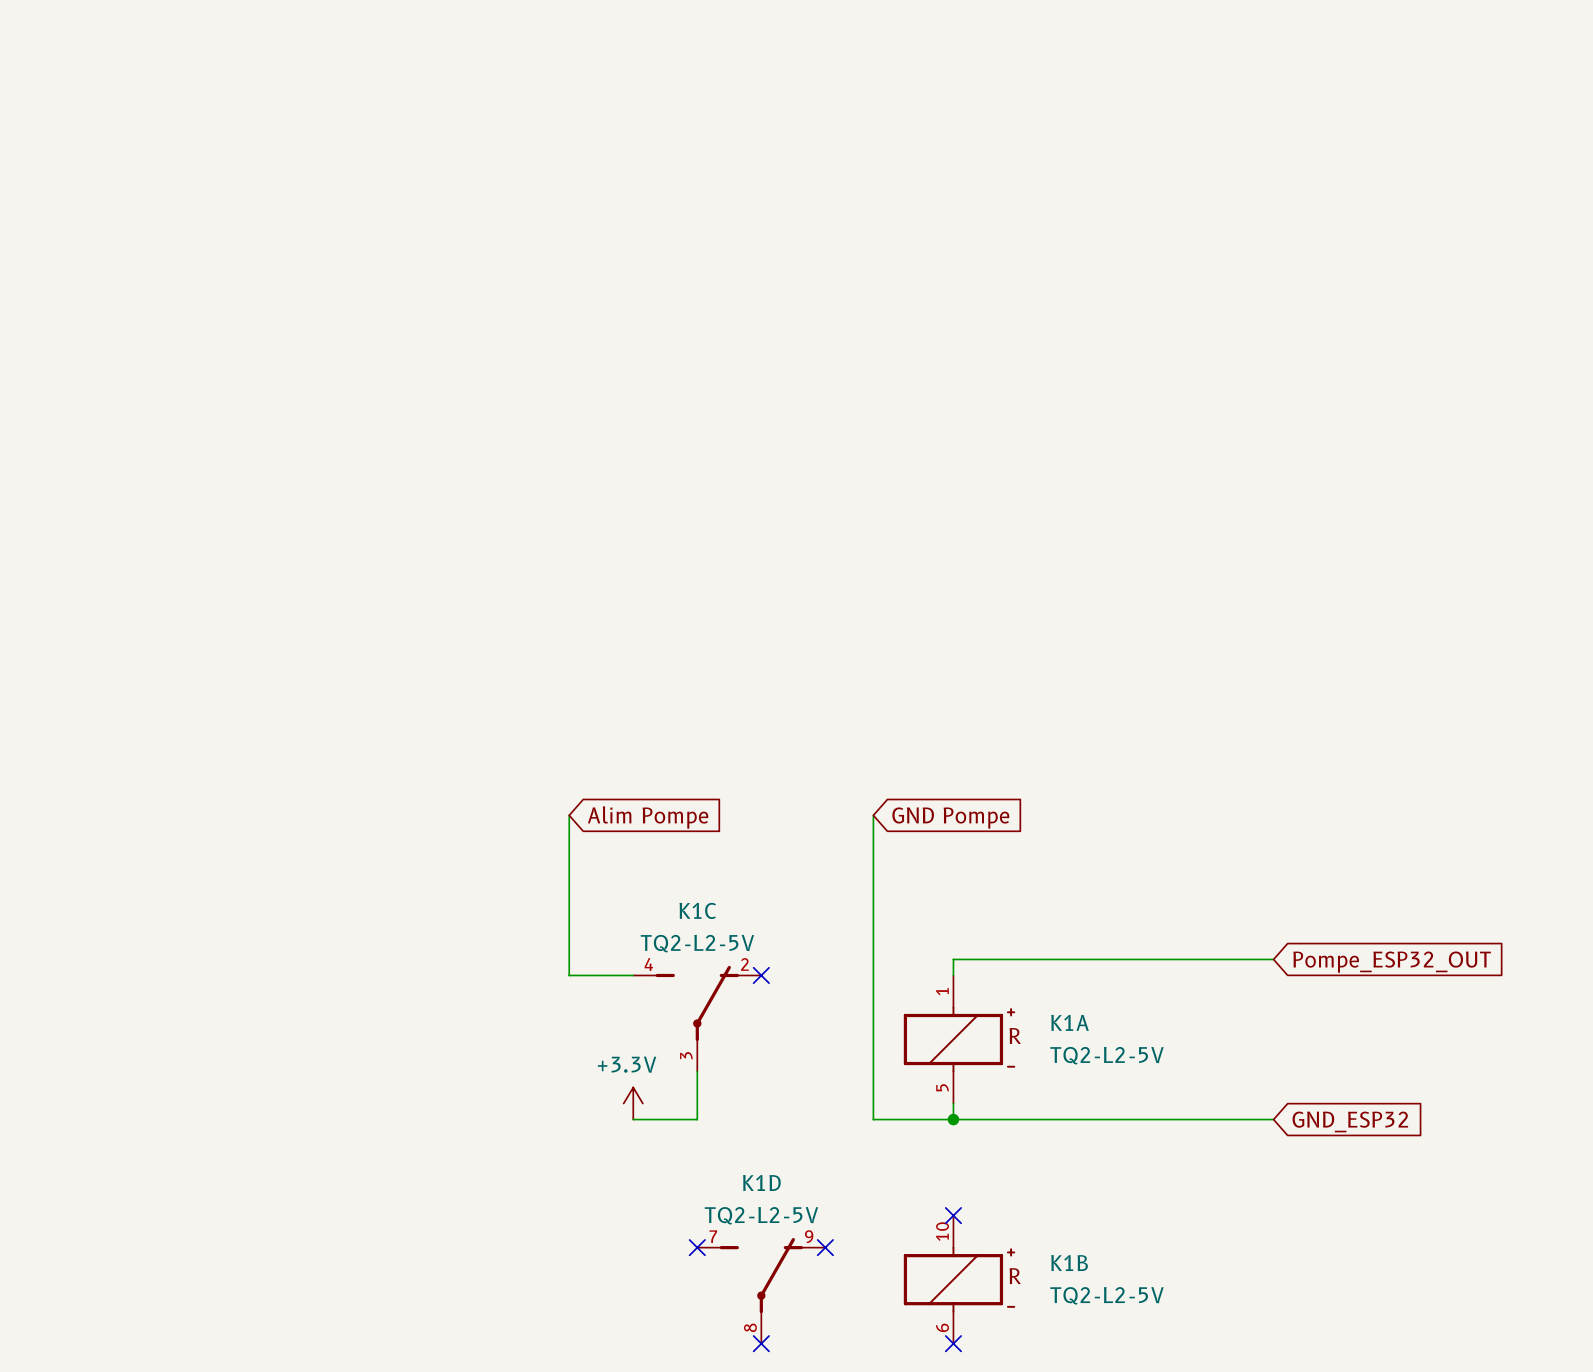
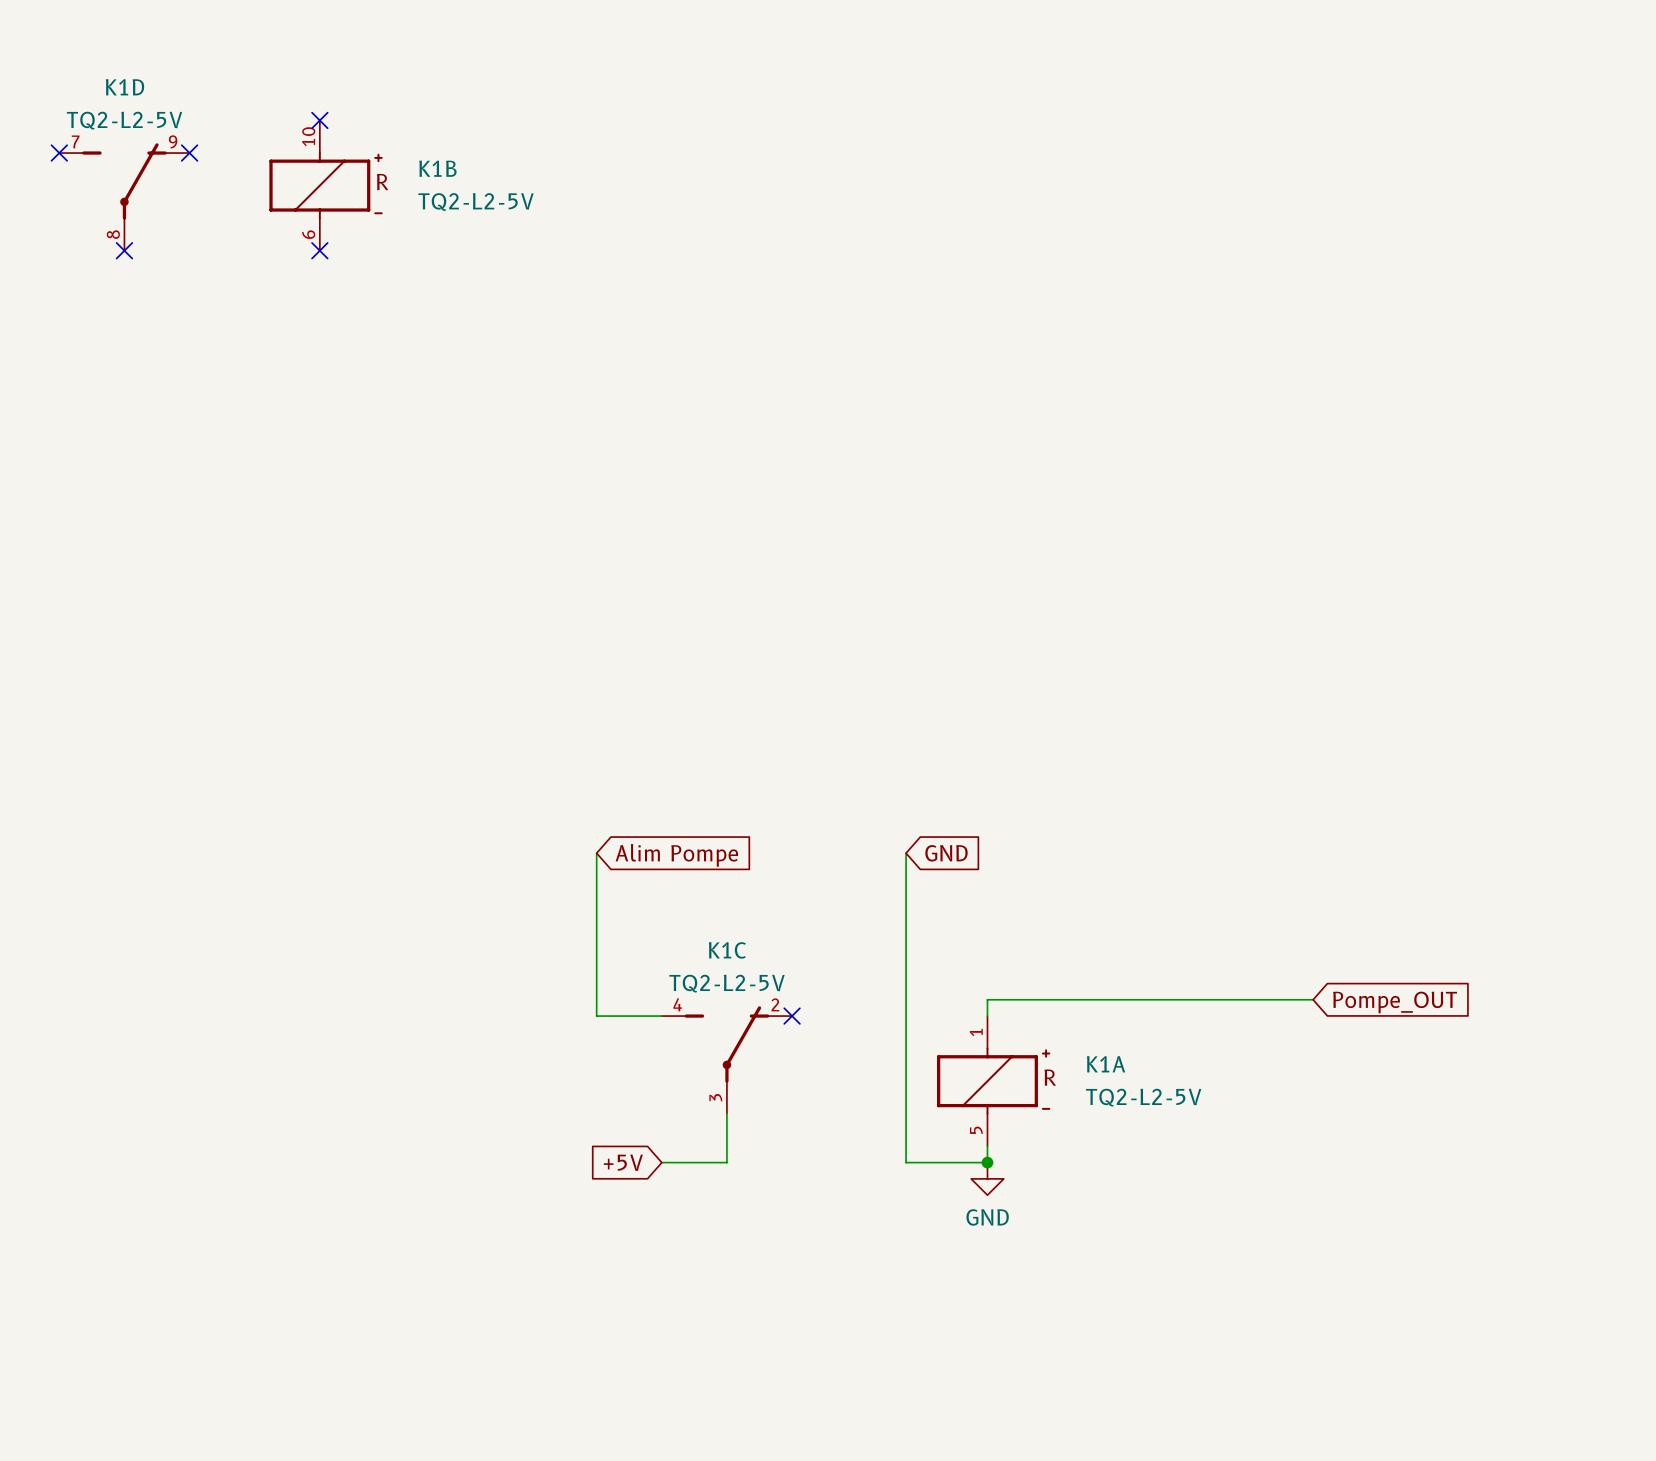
no-connect mark: none -> (319, 120)
no-connect mark: none -> (59, 153)
no-connect mark: none -> (189, 153)
no-connect mark: none -> (124, 250)
no-connect mark: none -> (319, 250)
global label: GND Pompe (950, 818) -> GND (946, 853)
global label: Pompe_ESP32_OUT (1392, 962) -> Pompe_OUT (1395, 1002)
power symbol: +3.3V (633, 1103) -> none
global label: none -> +5V (623, 1162)
wire: (953, 1119) (1273, 1119) -> none
global label: GND_ESP32 (1350, 1121) -> none
power symbol: none -> GND (987, 1178)
no-connect mark: (953, 1215) -> none
no-connect mark: (697, 1247) -> none
no-connect mark: (825, 1247) -> none
K1B position: (959, 1279) -> (326, 185)
K1D position: (761, 1290) -> (124, 196)
no-connect mark: (761, 1343) -> none
no-connect mark: (953, 1343) -> none

